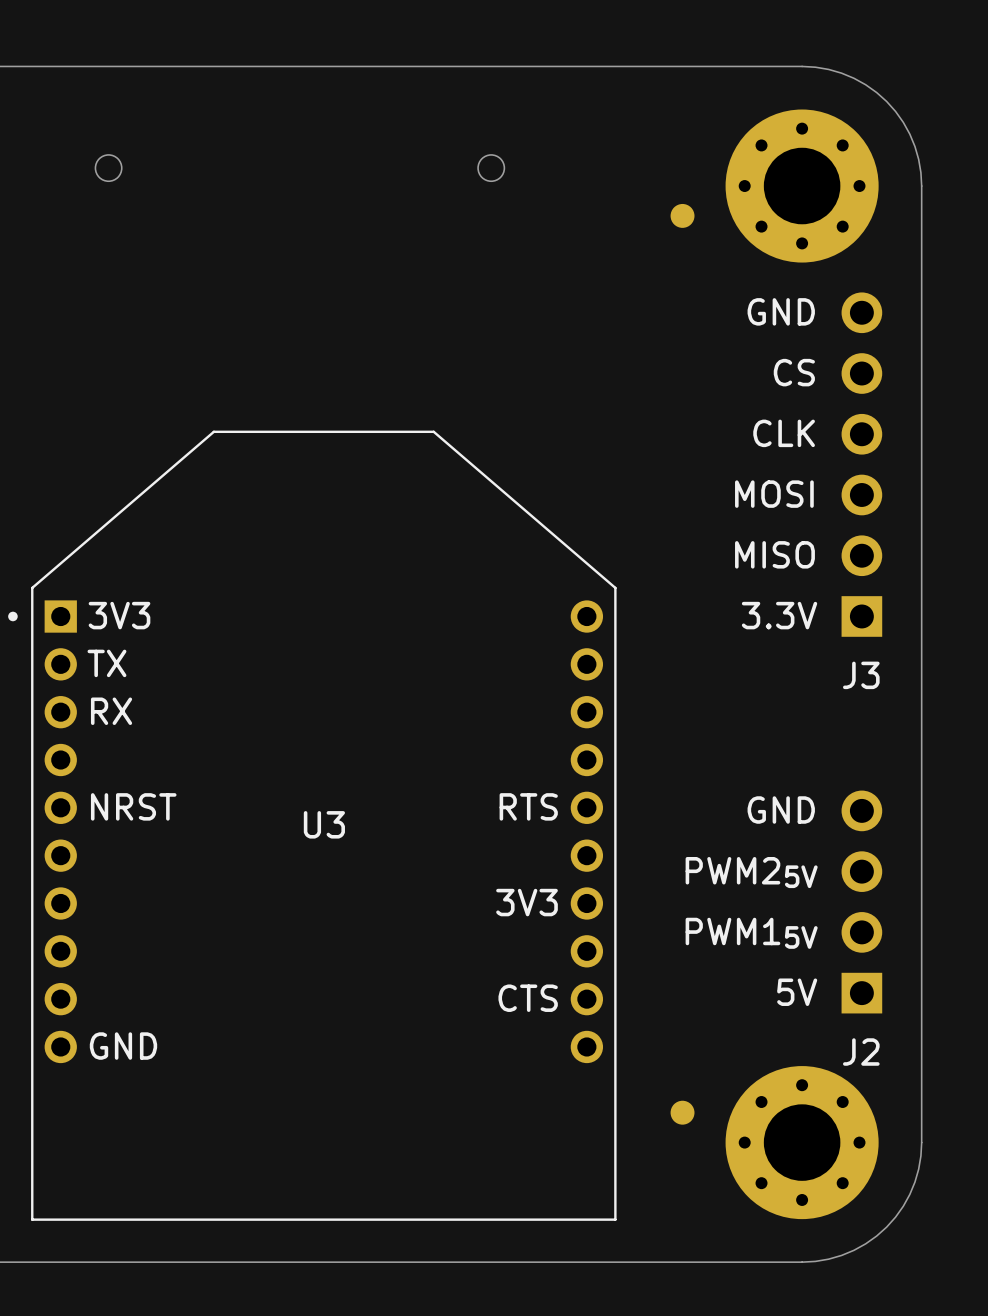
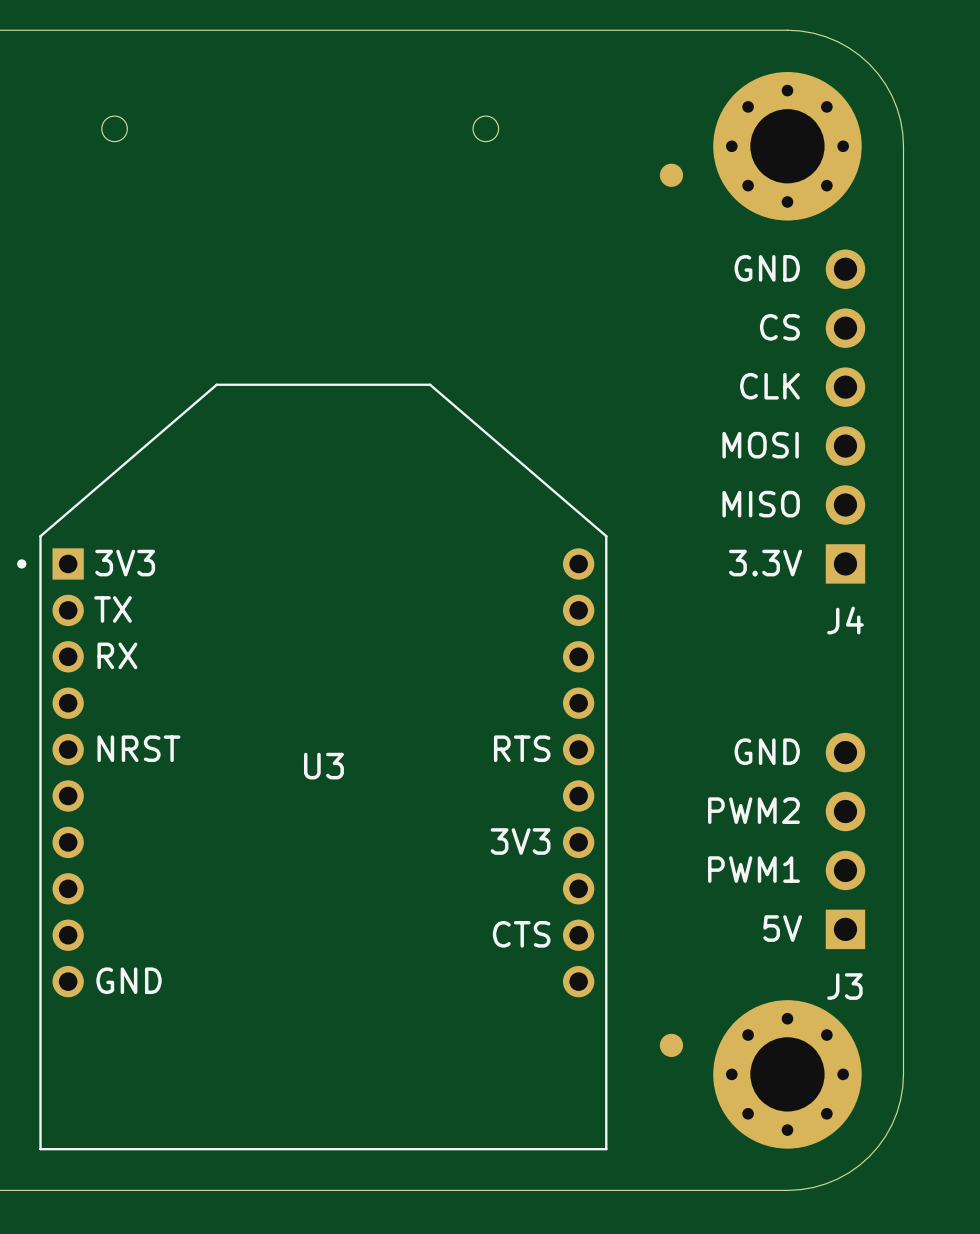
text: J3 (861, 675) -> J4 (845, 620)
text: PWM25V (751, 872) -> PWM2 (753, 810)
text: PWM15V (751, 933) -> PWM1 (753, 869)
text: J2 (861, 1052) -> J3 (844, 986)

